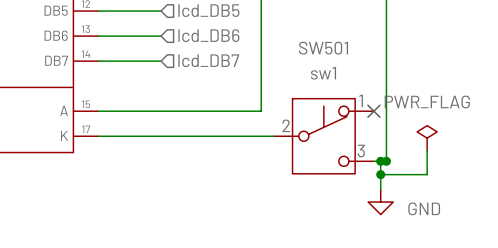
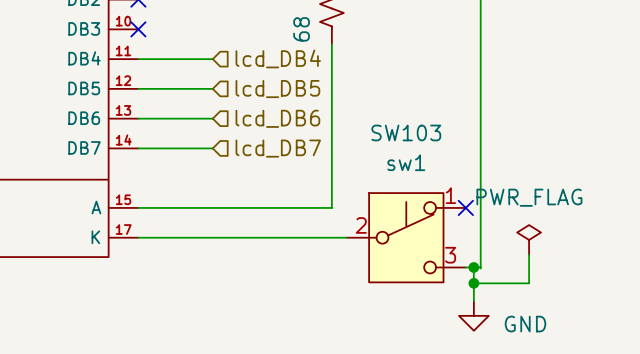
SW501 name: SW501 (323, 48) -> SW103 (406, 132)
junction: (386, 161) -> none

